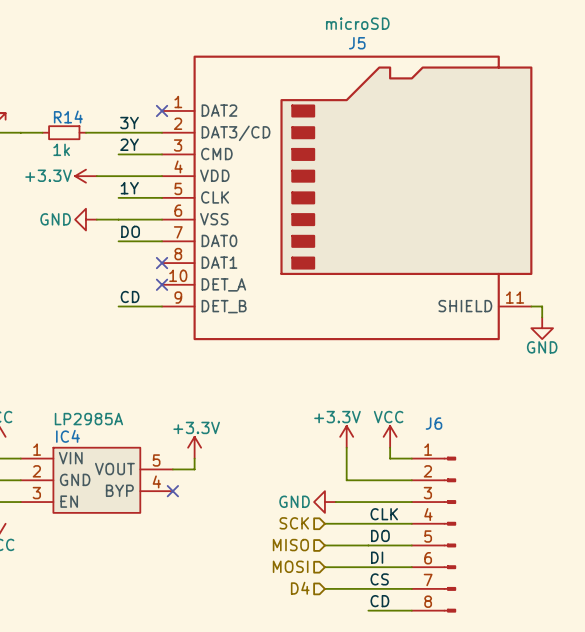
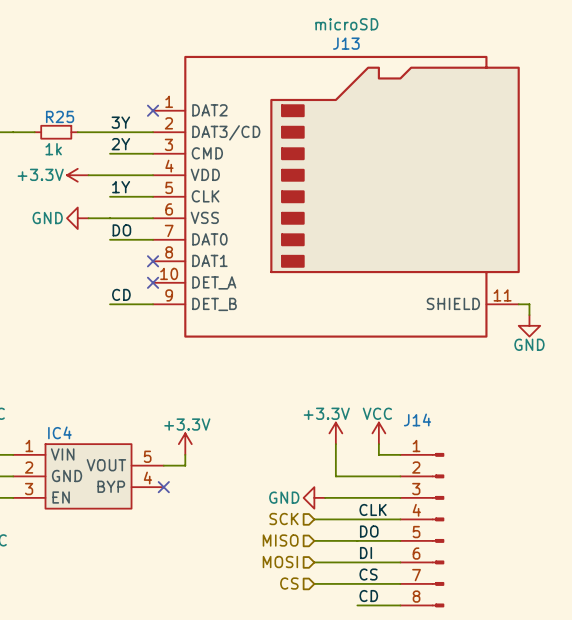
J5 name: J5 (357, 43) -> J13 (346, 43)
R14 name: R14 (68, 117) -> R25 (60, 116)
IC4 value: LP2985A (88, 419) -> none
J6 name: J6 (434, 423) -> J14 (417, 419)
hierarchical label: D4 (300, 588) -> CS (289, 583)

